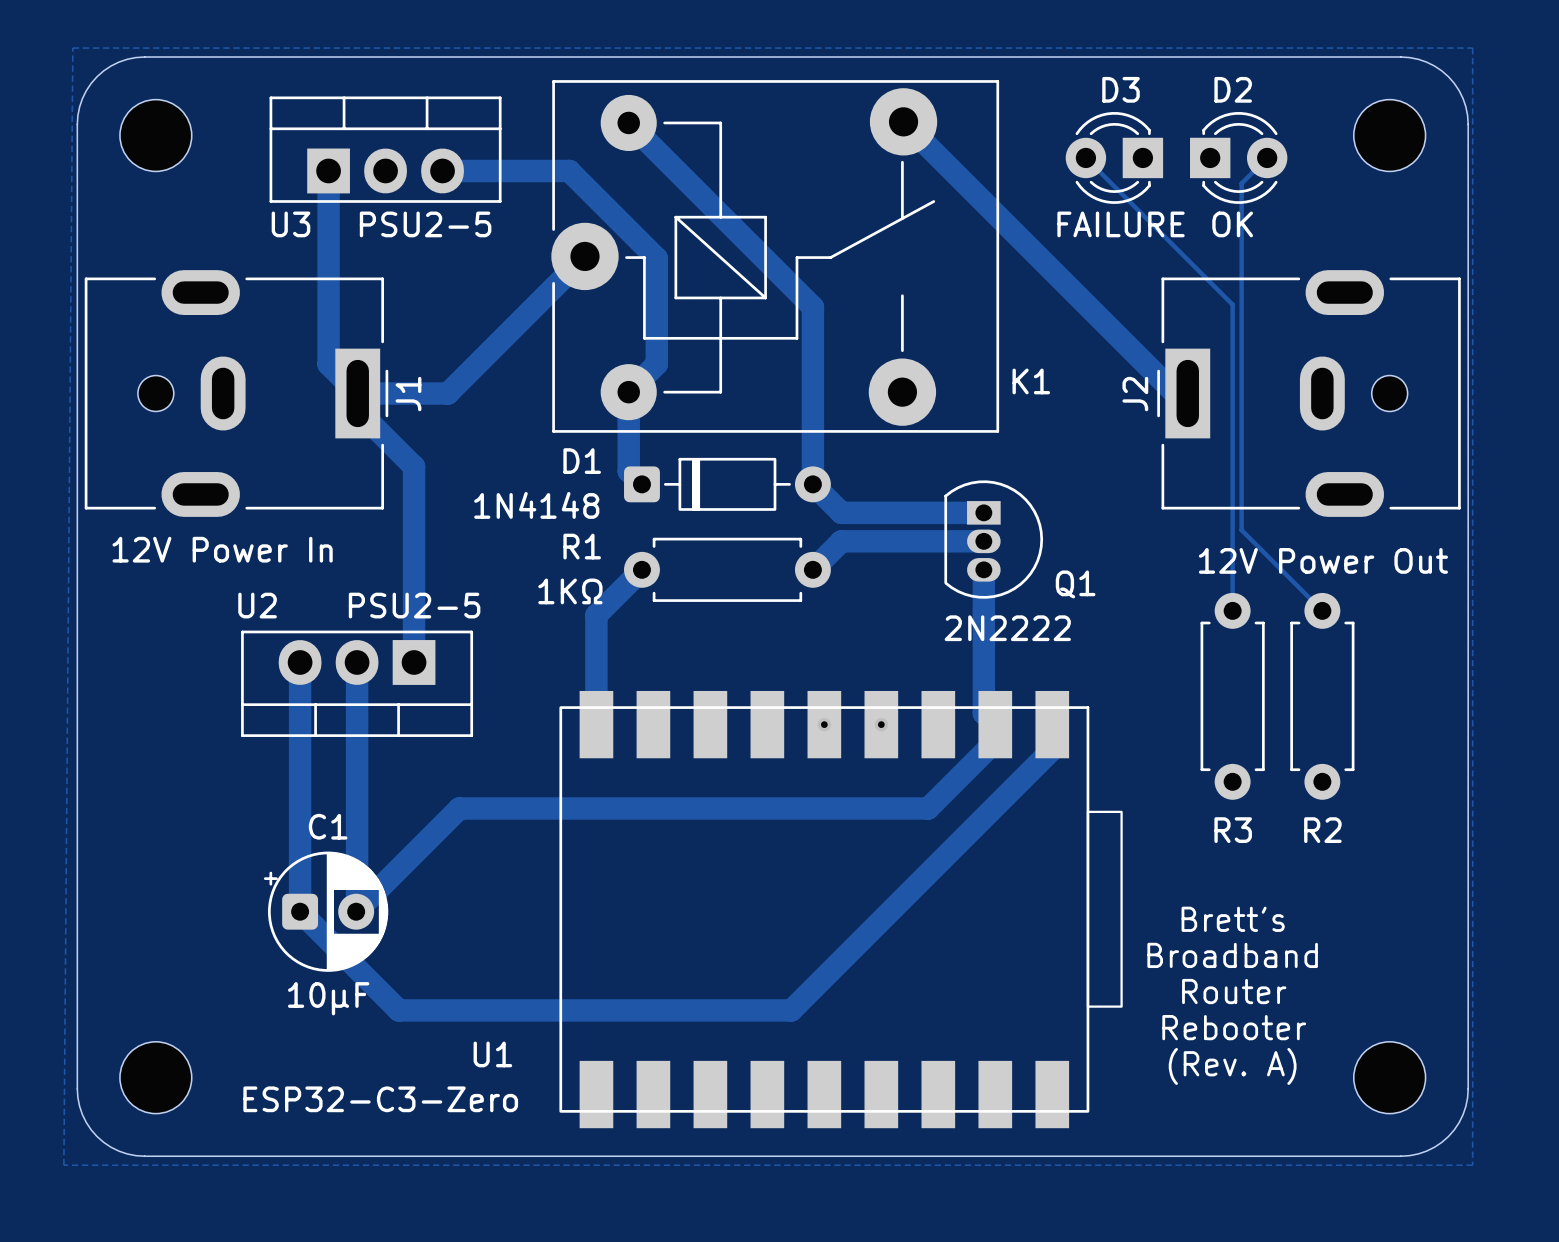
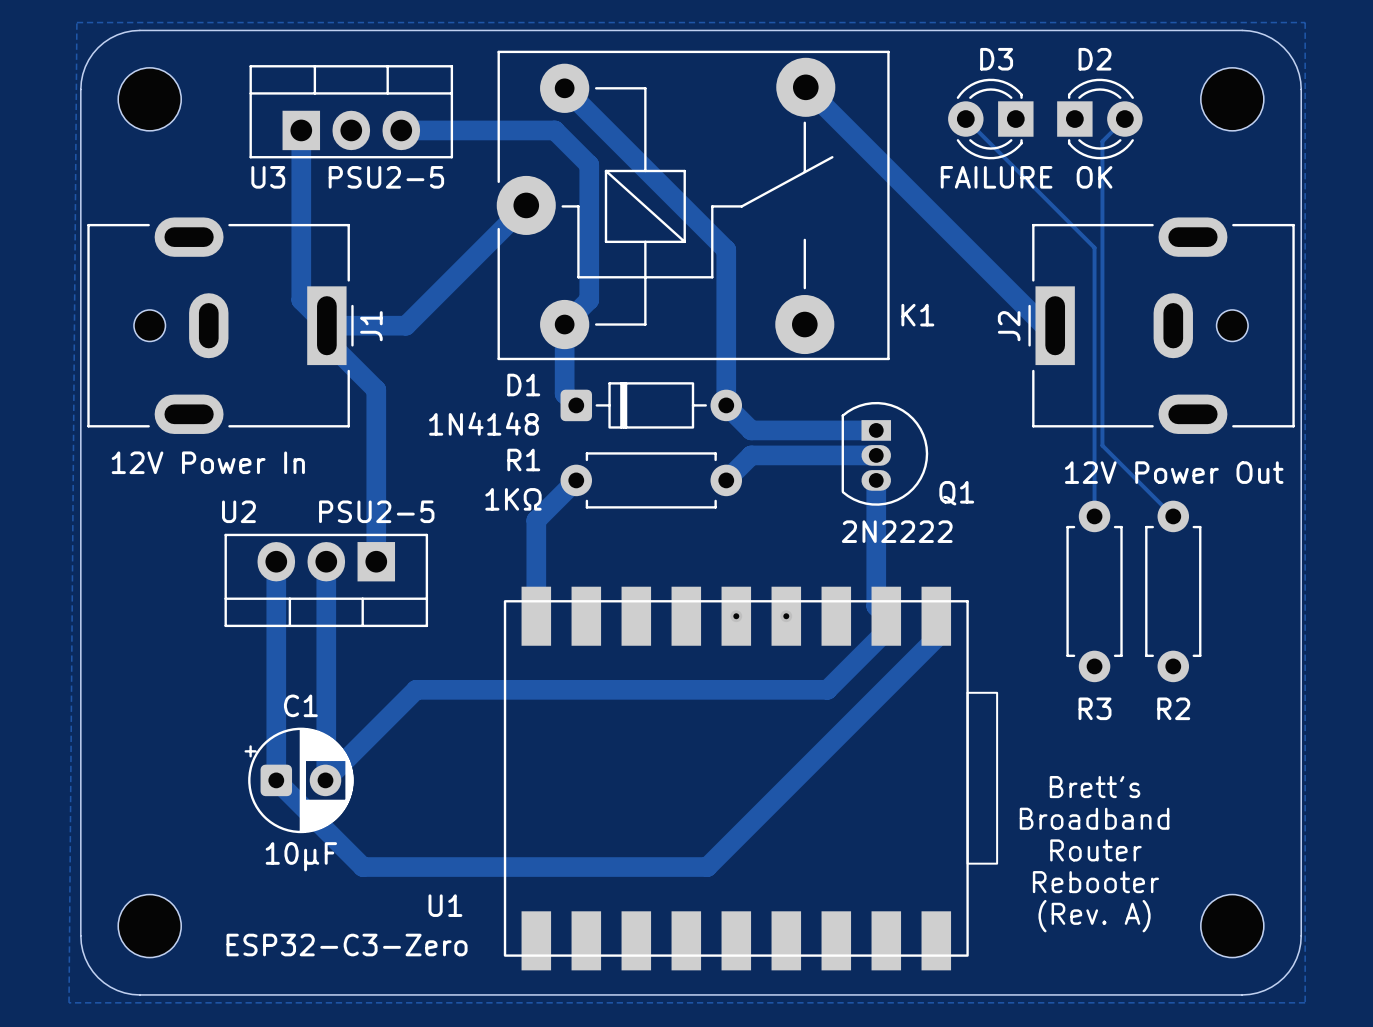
track: (569, 170) (656, 258) -> (512, 130) (554, 130) (589, 164) (589, 207)

